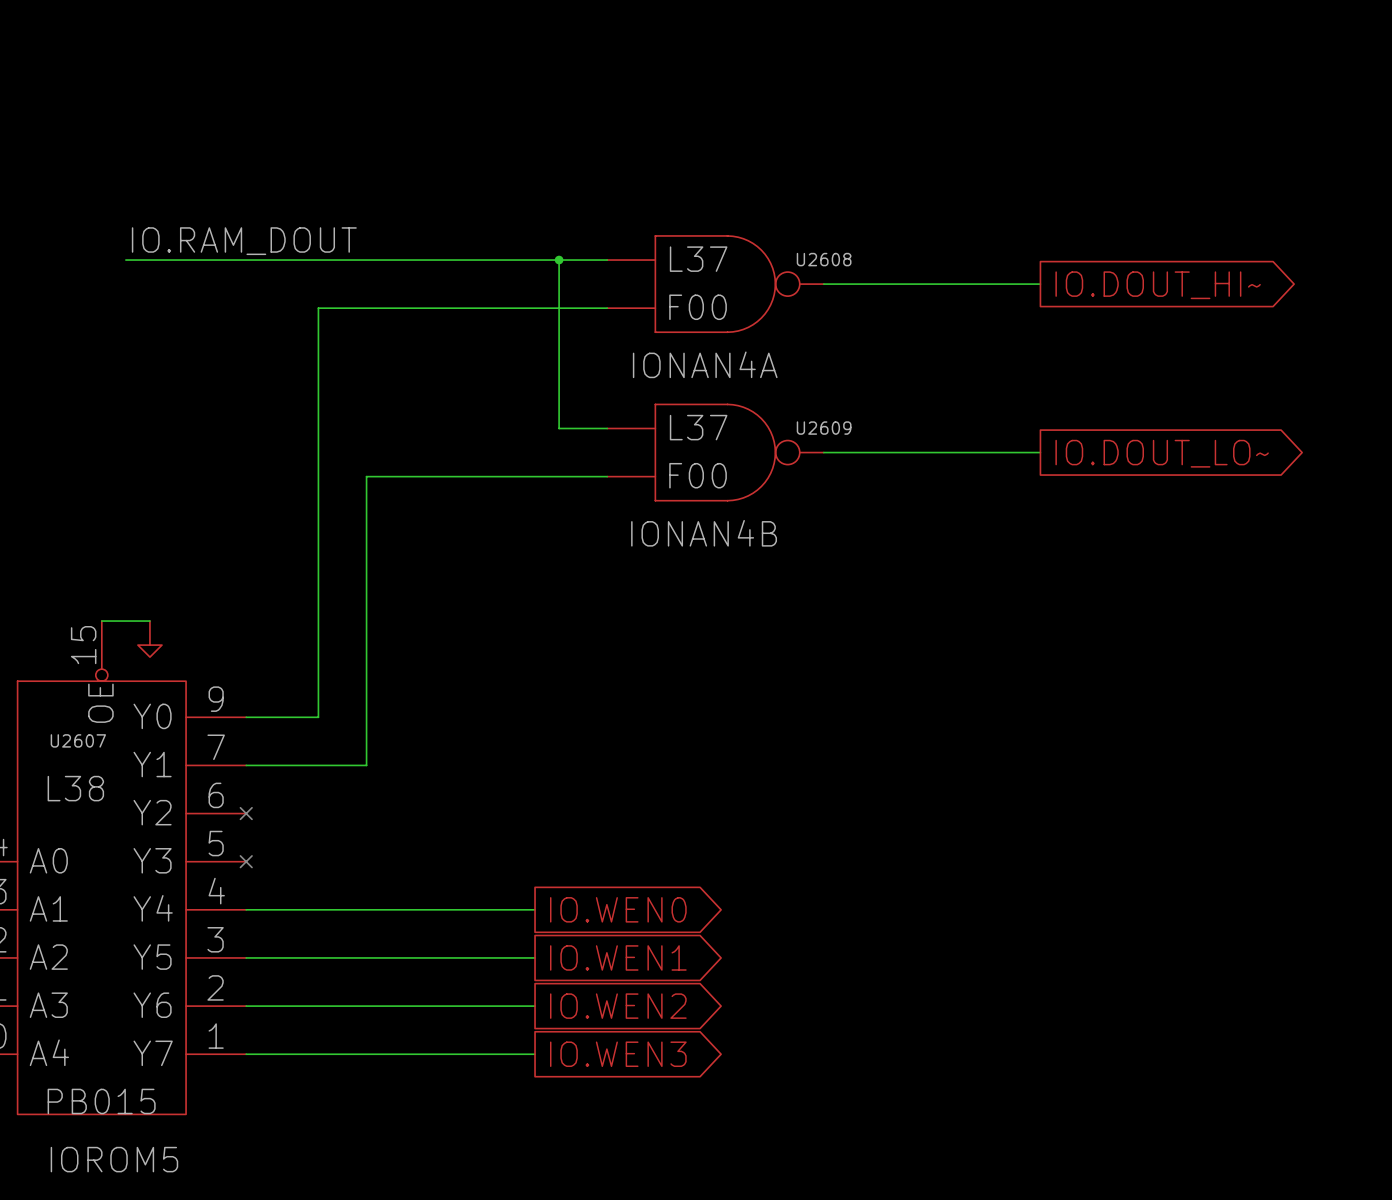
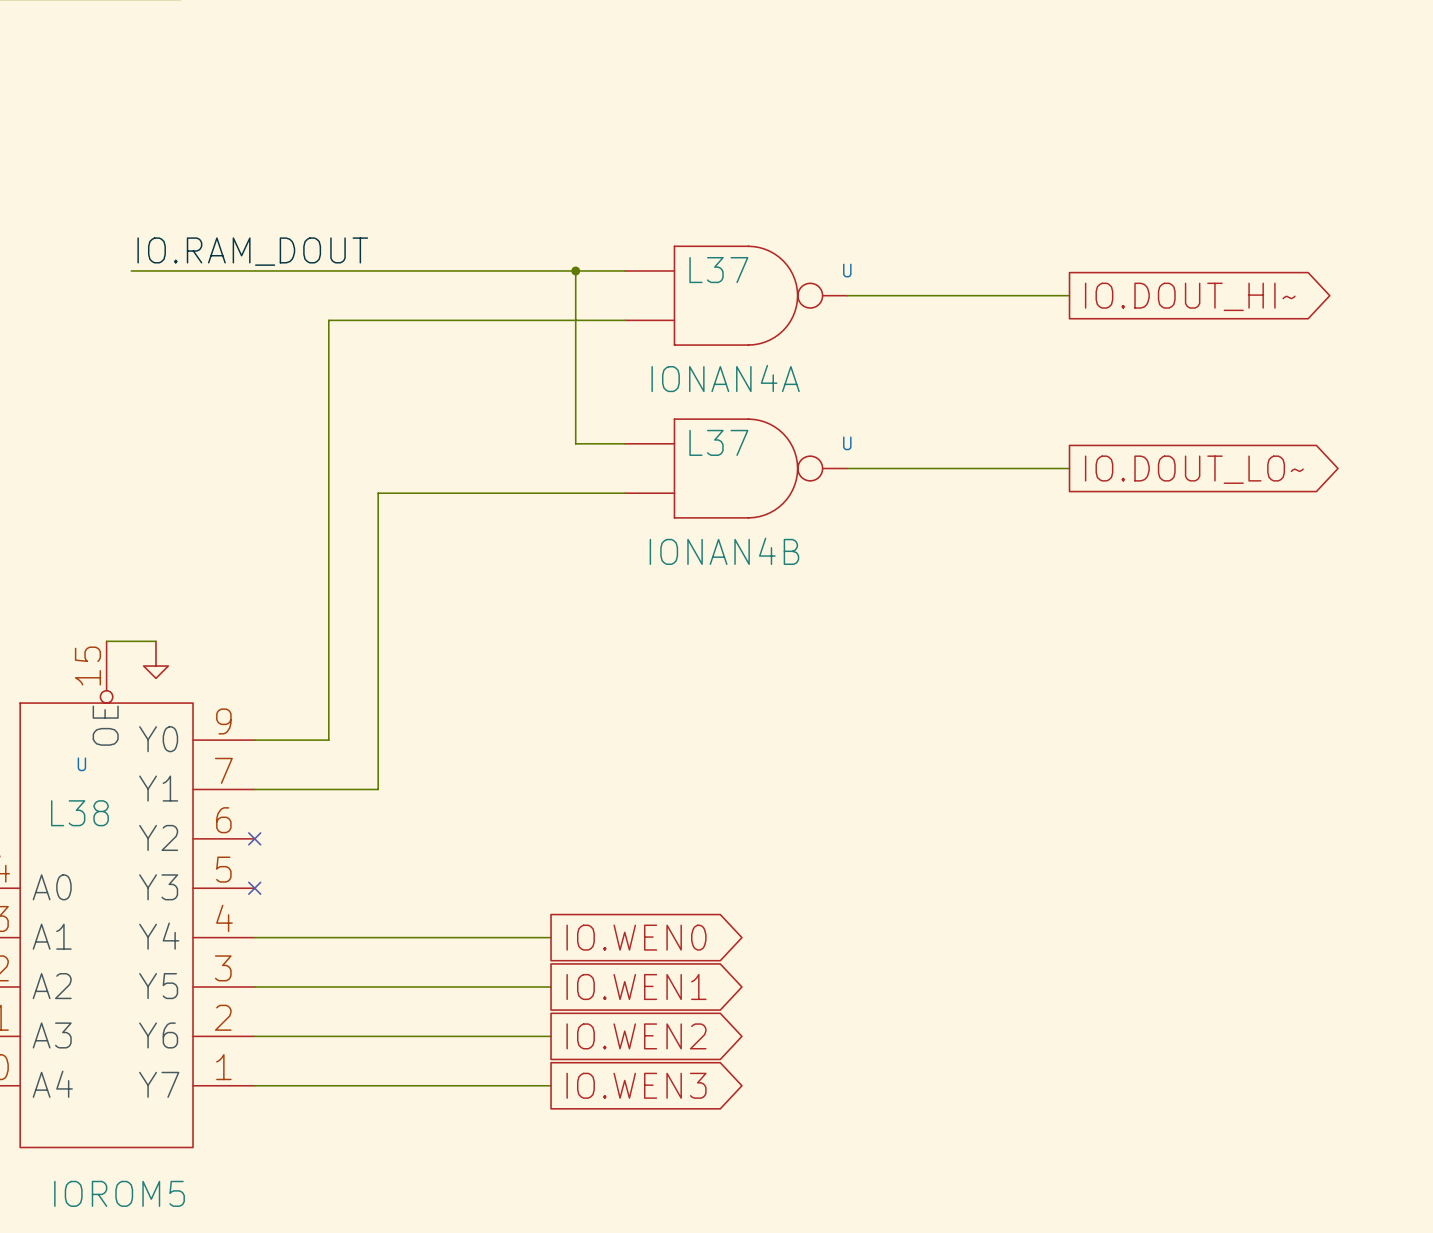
U2608 name: U2608 (824, 259) -> U (847, 270)
U2608 value: F00 (698, 307) -> none
U2609 name: U2609 (824, 428) -> U (847, 443)
U2609 value: F00 (698, 475) -> none
U2607 name: U2607 (78, 740) -> U (81, 764)
U2607 value: PB015 (101, 1101) -> none

